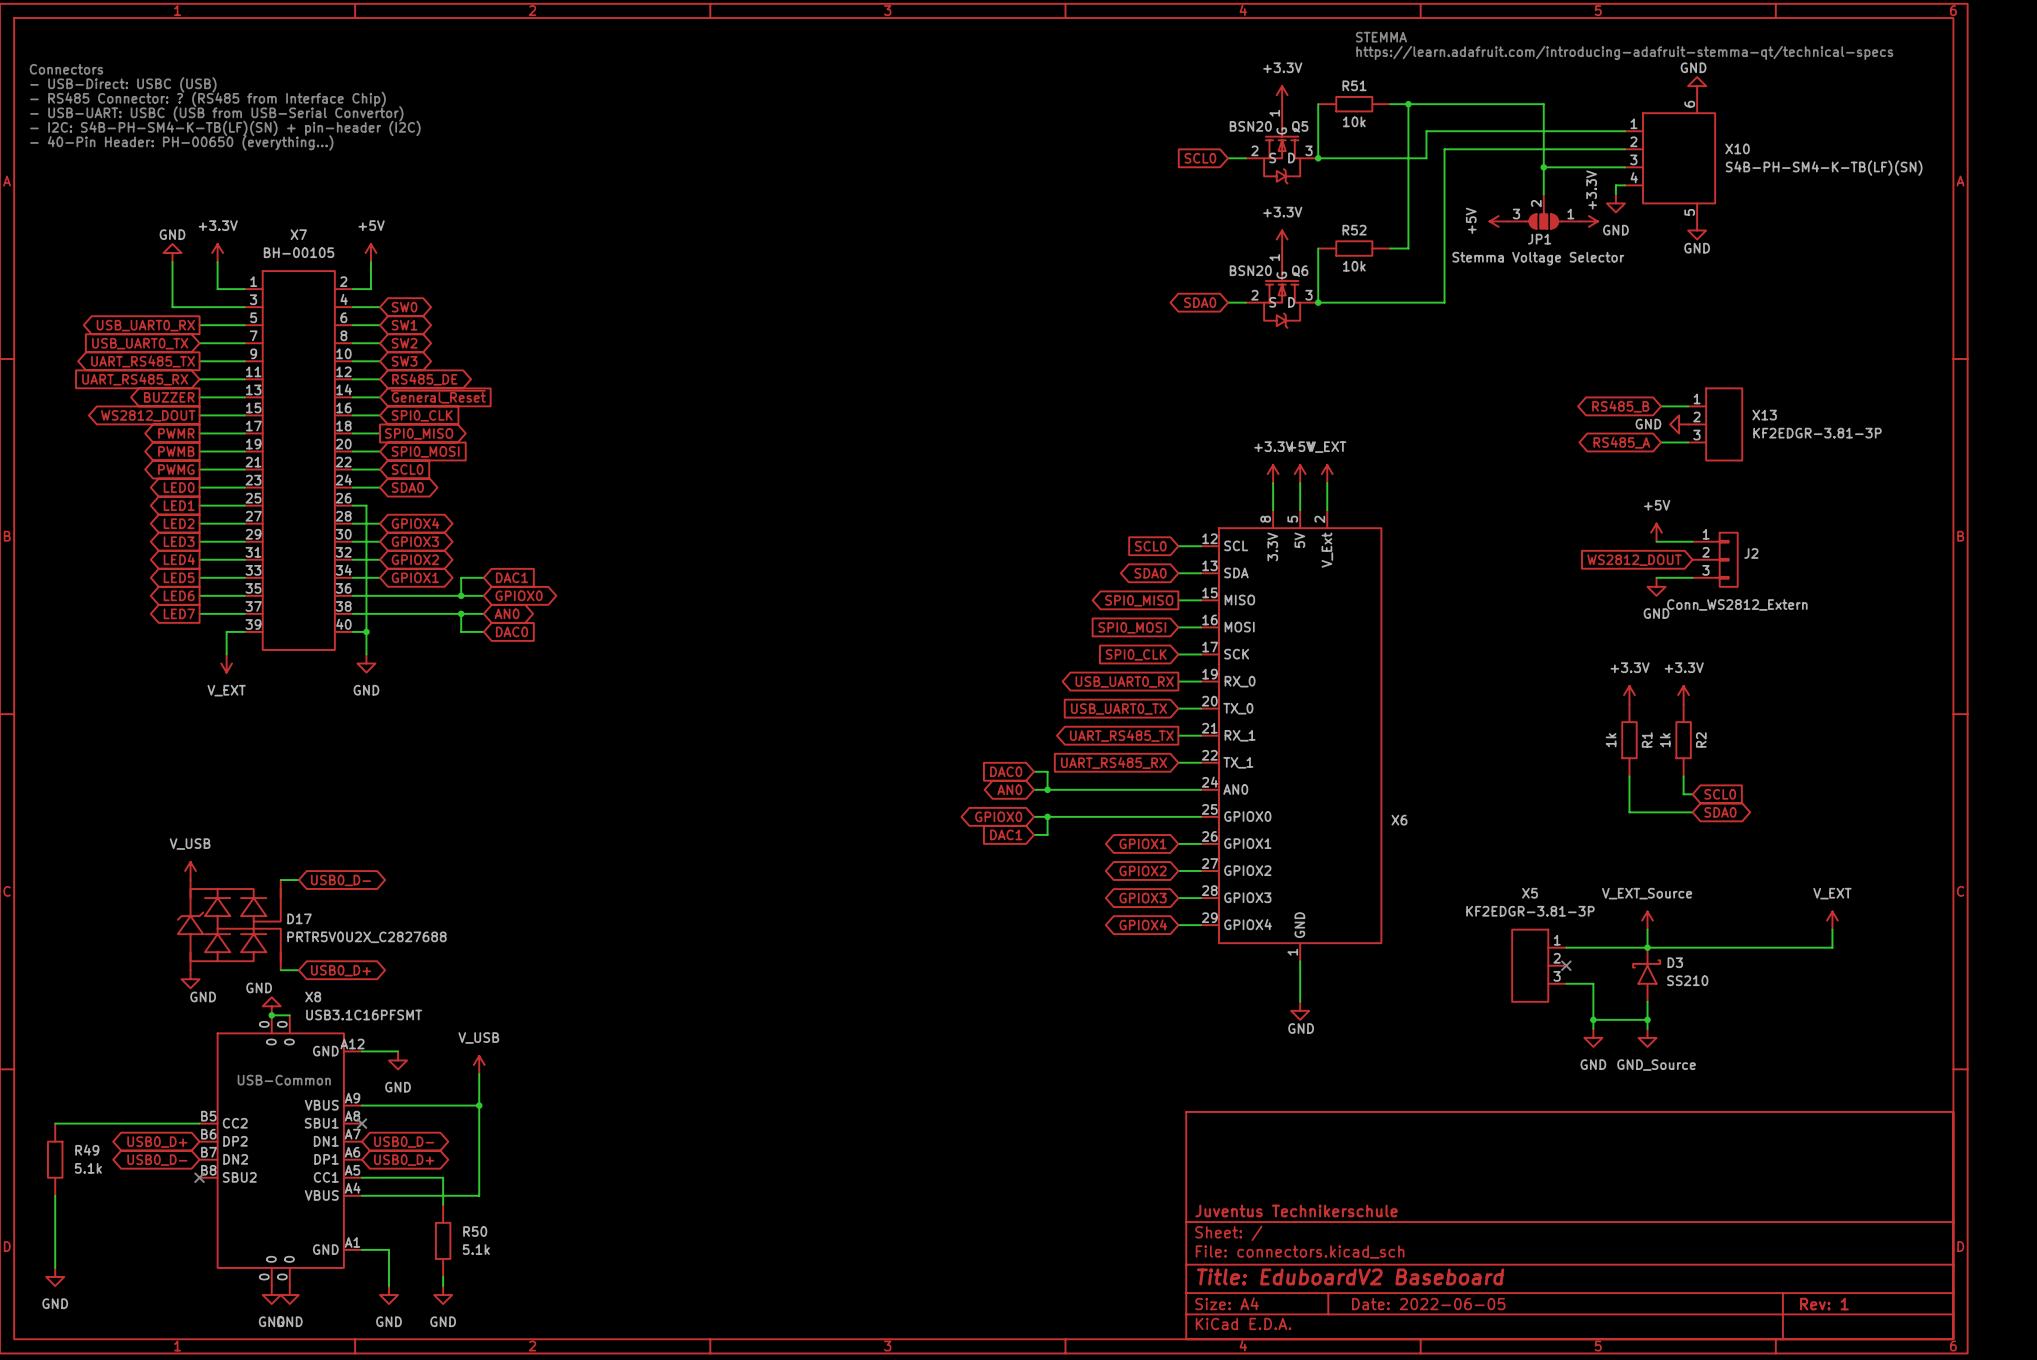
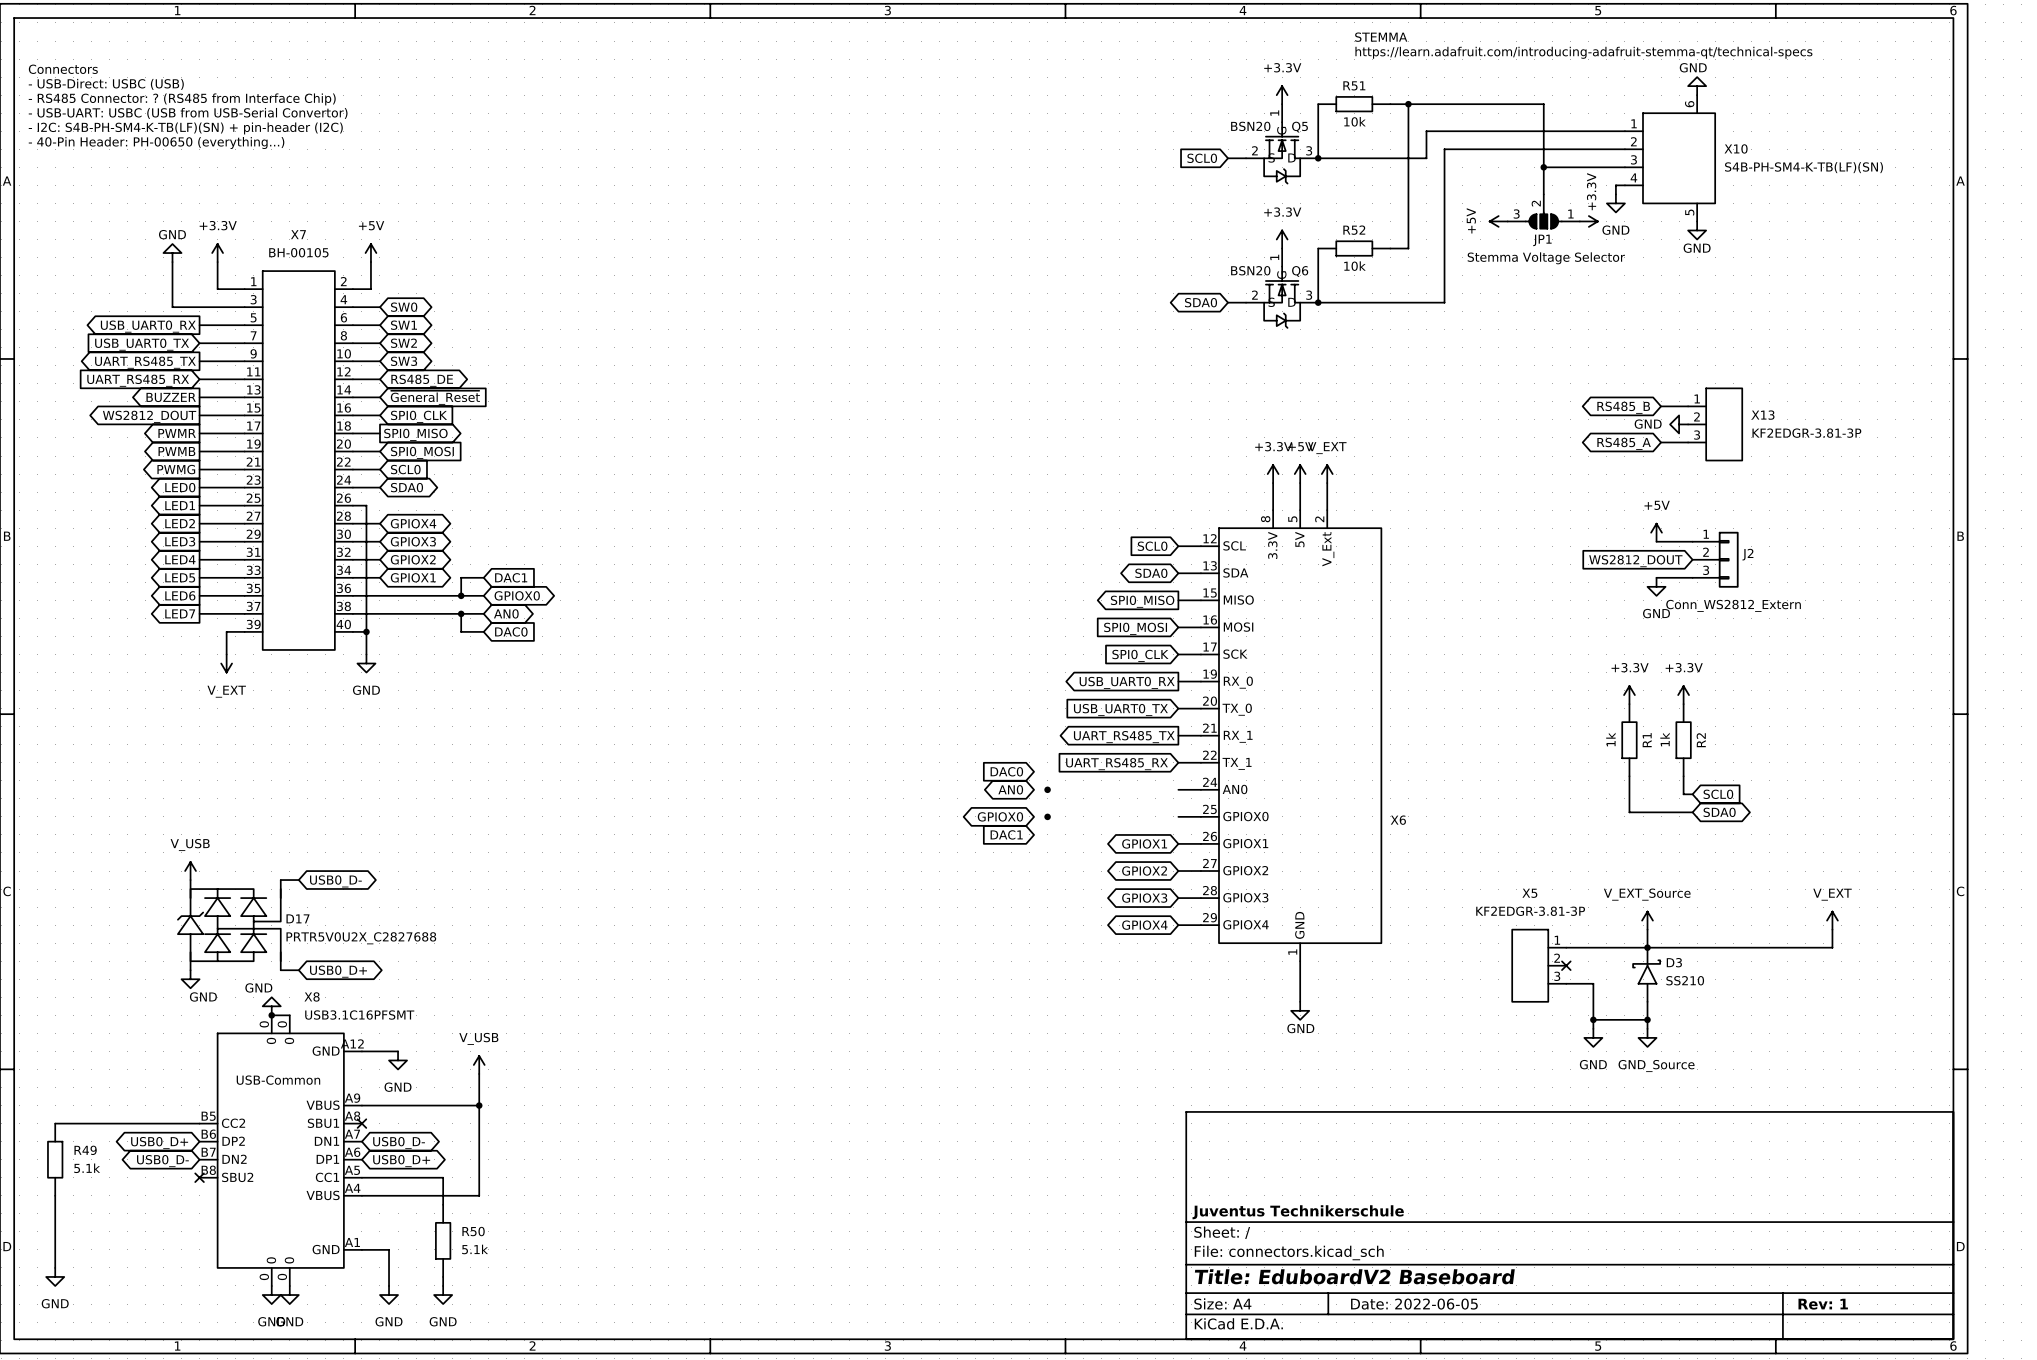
wire: (1034, 771) (1047, 771) (1047, 789) -> none
wire: (1034, 789) (1178, 789) -> none
wire: (1034, 816) (1178, 816) -> none
wire: (1047, 816) (1047, 834) (1034, 834) -> none

